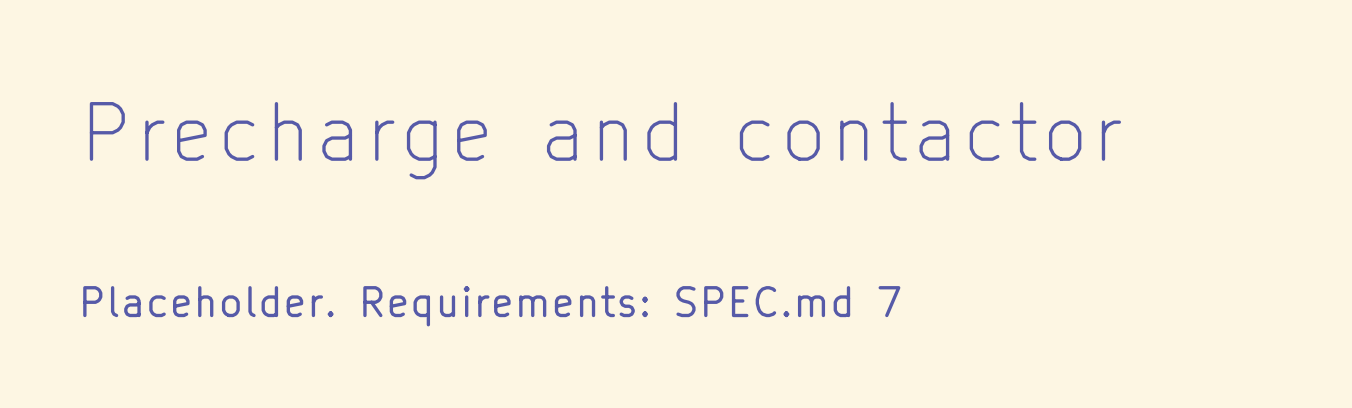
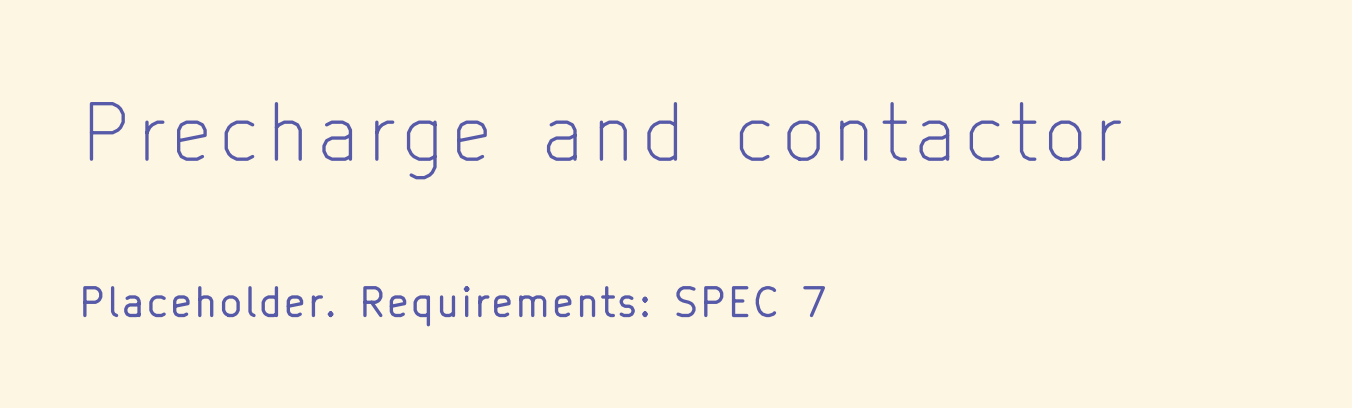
text: Placeholder. Requirements: SPEC.md 7 (491, 306) -> Placeholder. Requirements: SPEC 7 (454, 306)

